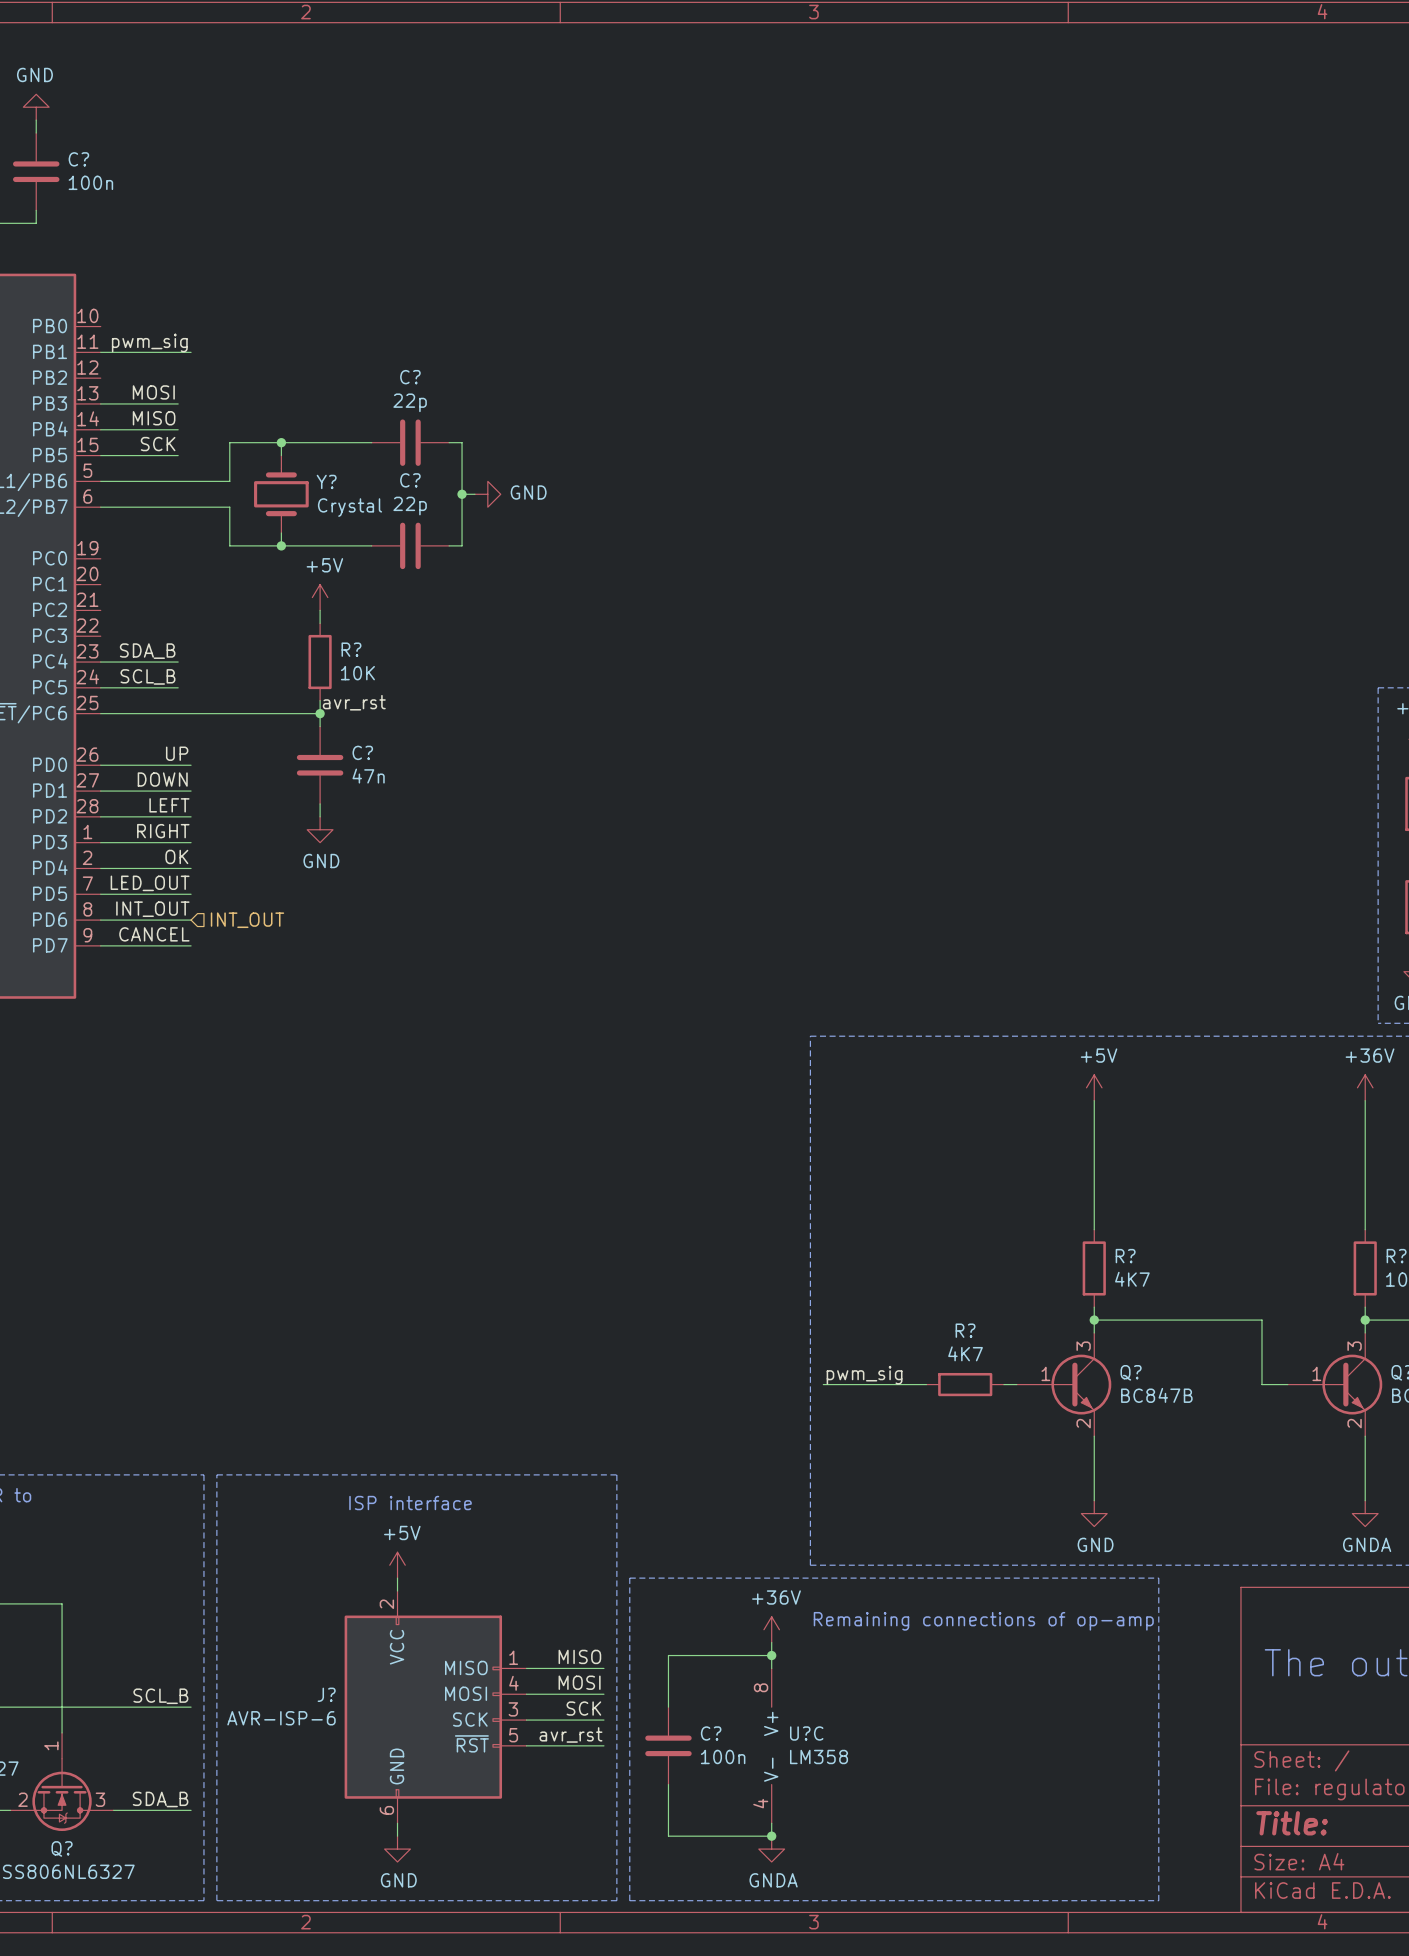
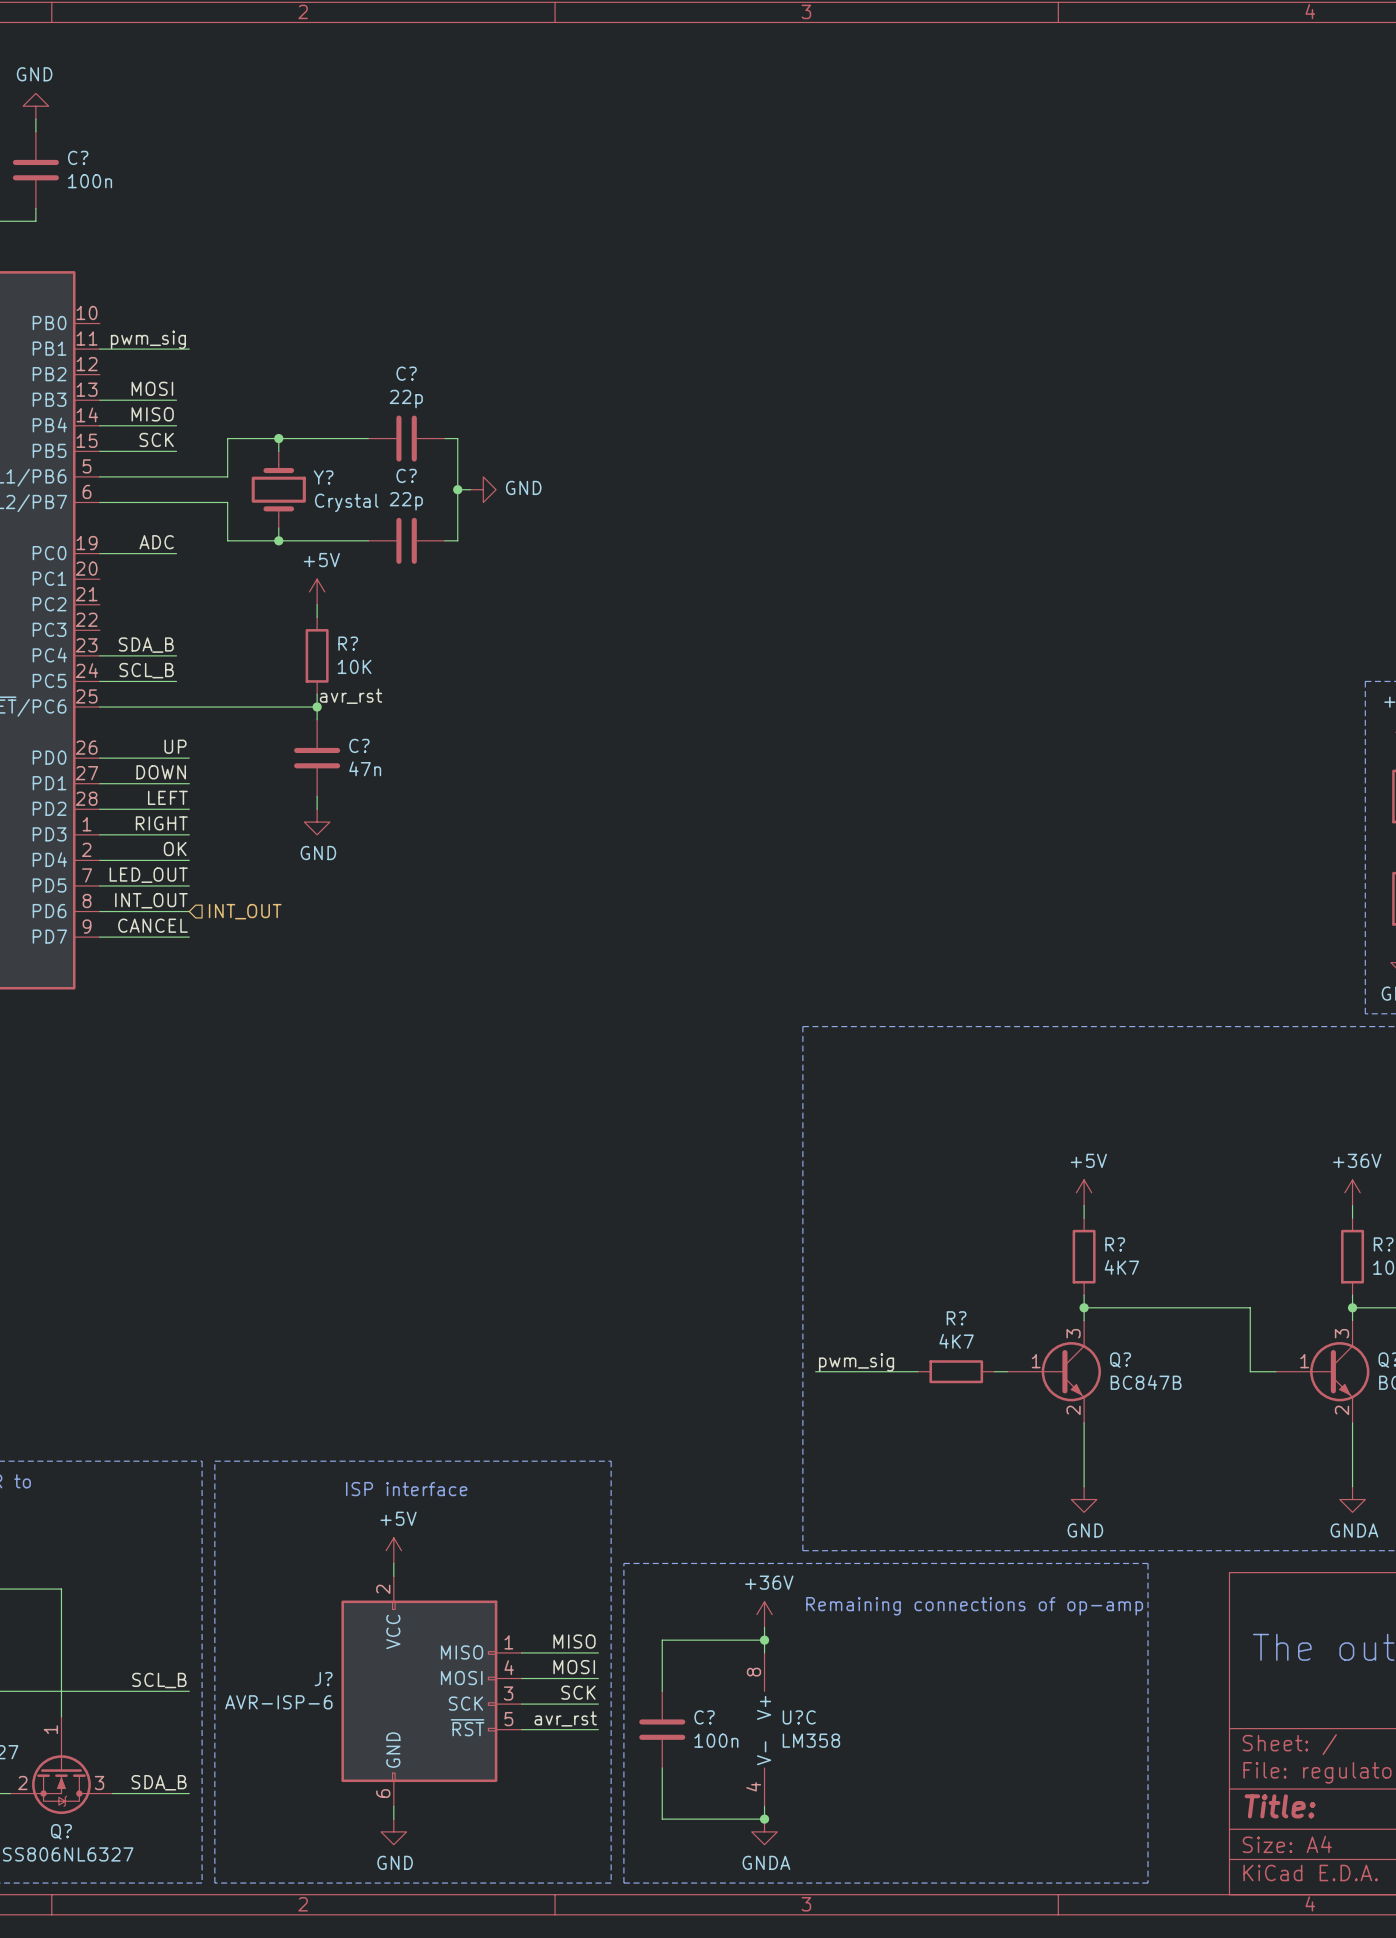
label: none -> ADC (156, 542)
wire: none -> (99, 553) (176, 553)
power symbol position: +5V (1094, 1087) -> +5V (1084, 1192)
power symbol position: +36V (1365, 1087) -> +36V (1352, 1192)
wire: (1094, 1100) (1094, 1216) -> none
wire: (1365, 1100) (1365, 1216) -> none

